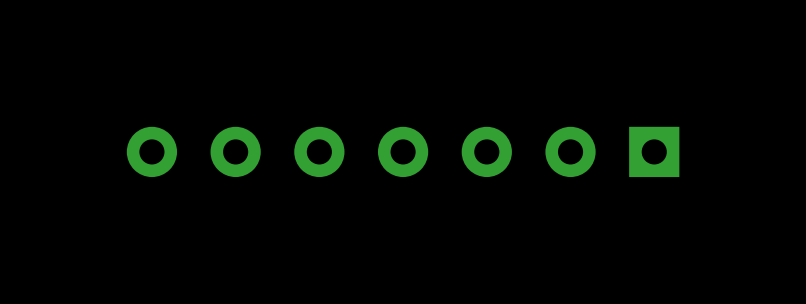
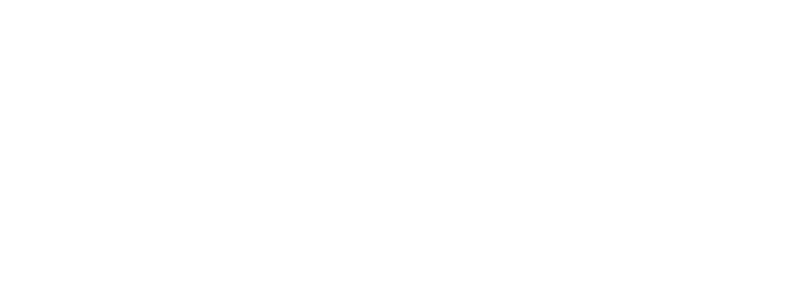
part: (403, 151) -> none

